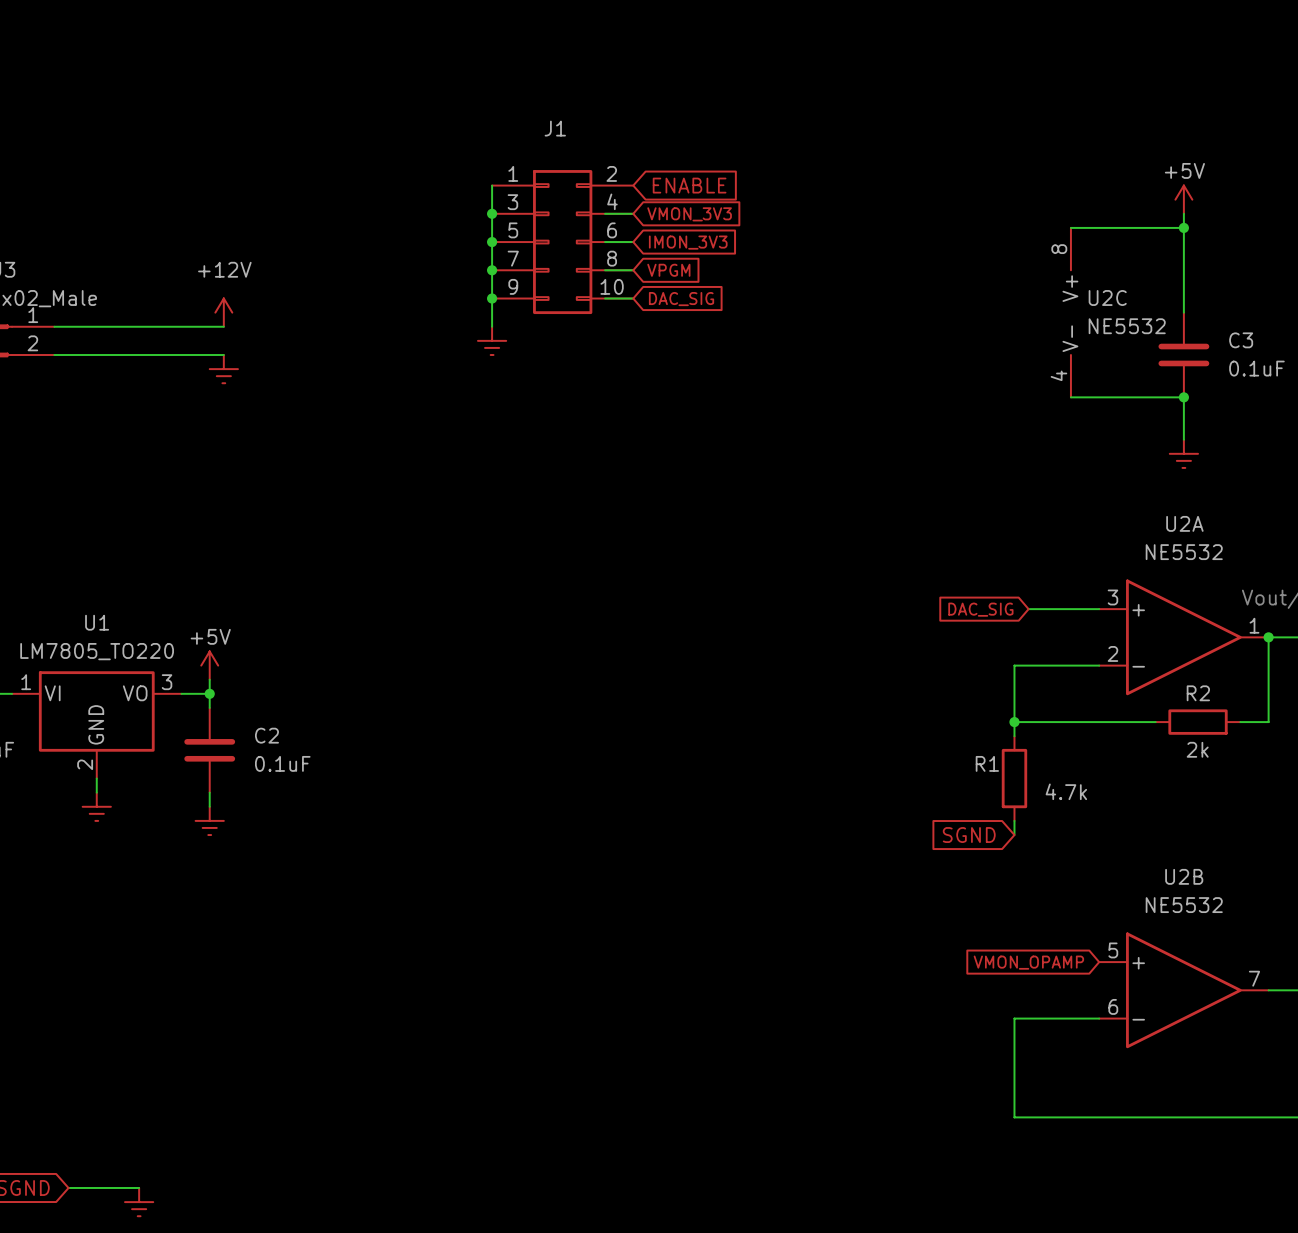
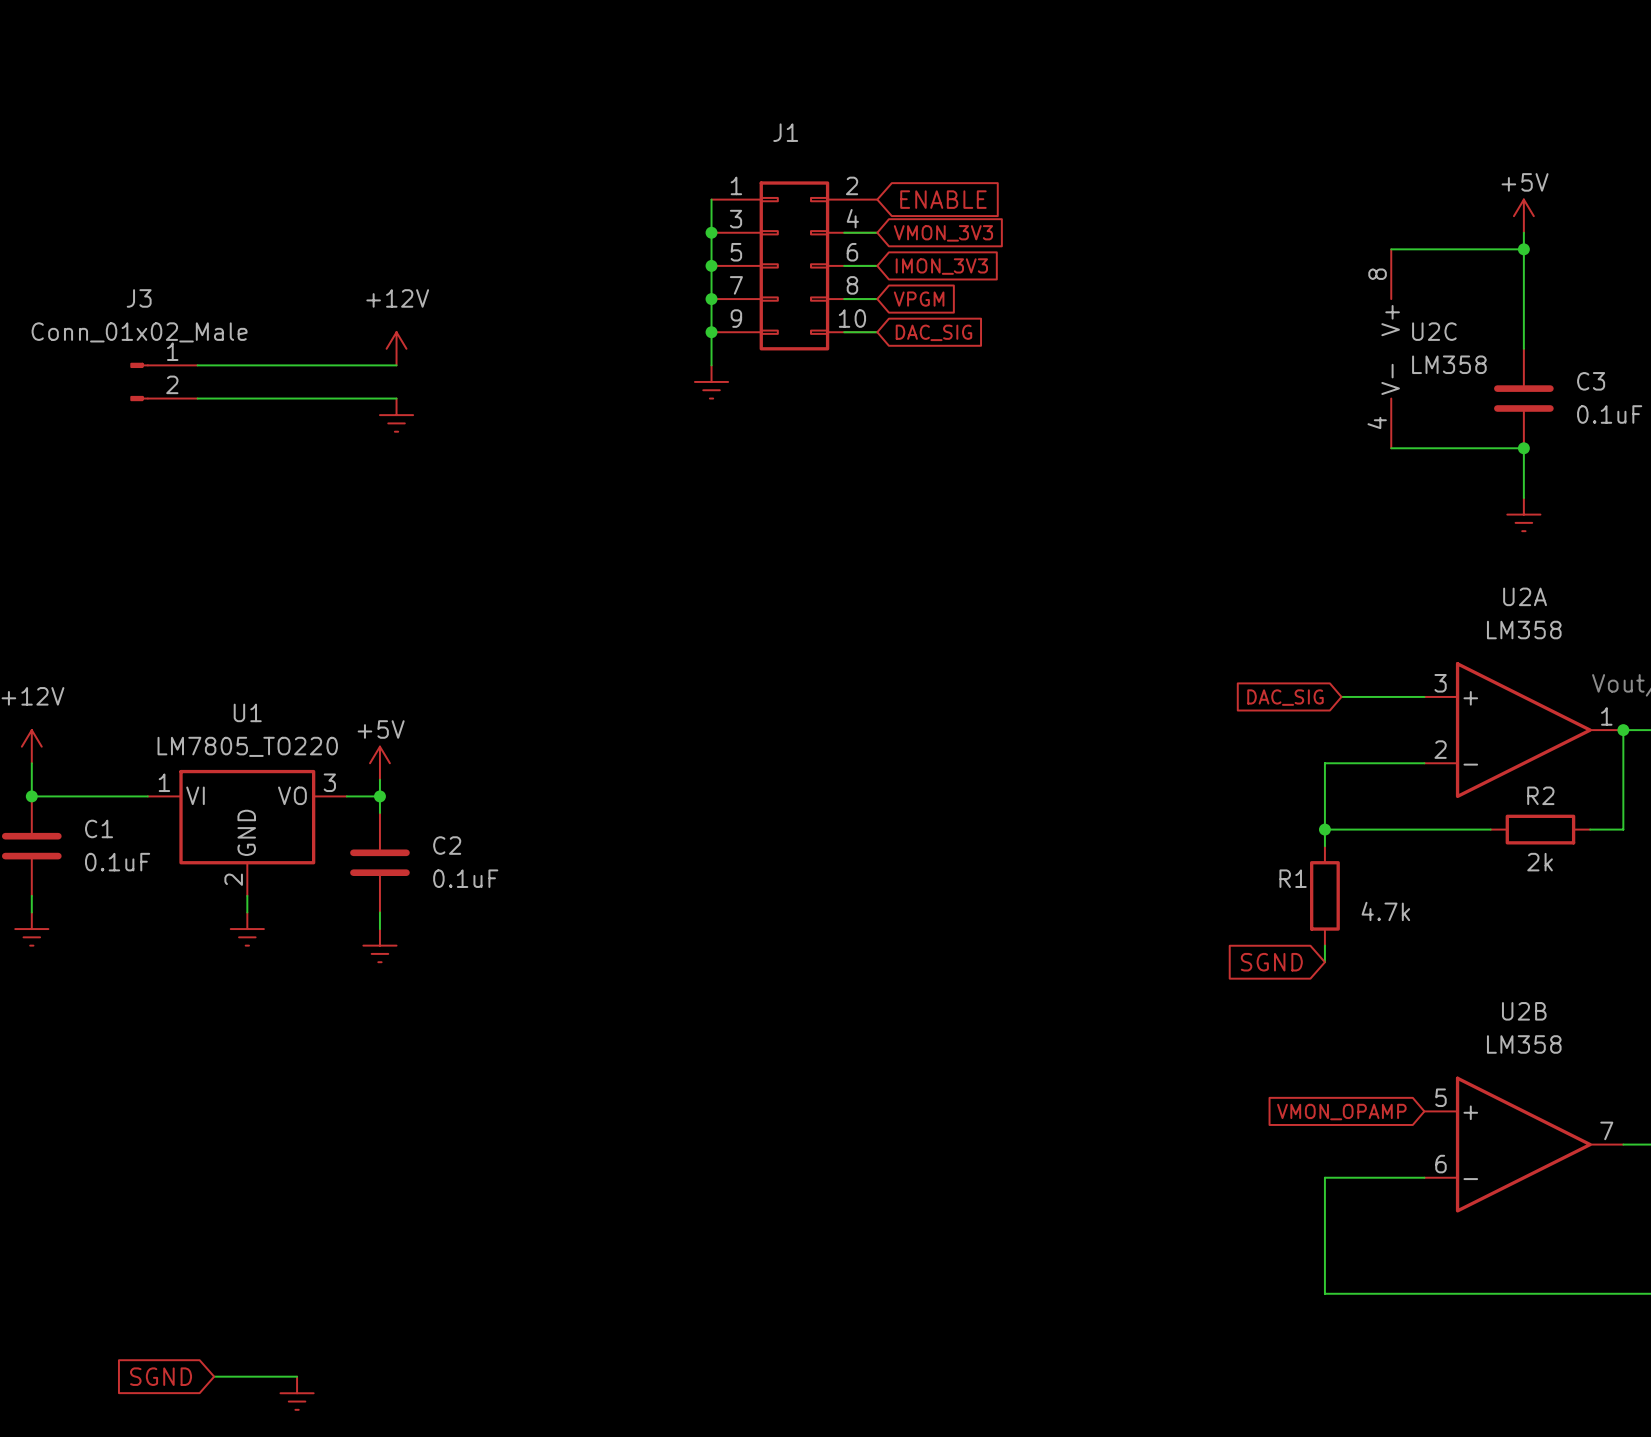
U2C value: NE5532 (1127, 326) -> LM358 (1449, 364)
U2A value: NE5532 (1184, 552) -> LM358 (1524, 630)
U2B value: NE5532 (1184, 905) -> LM358 (1524, 1044)

